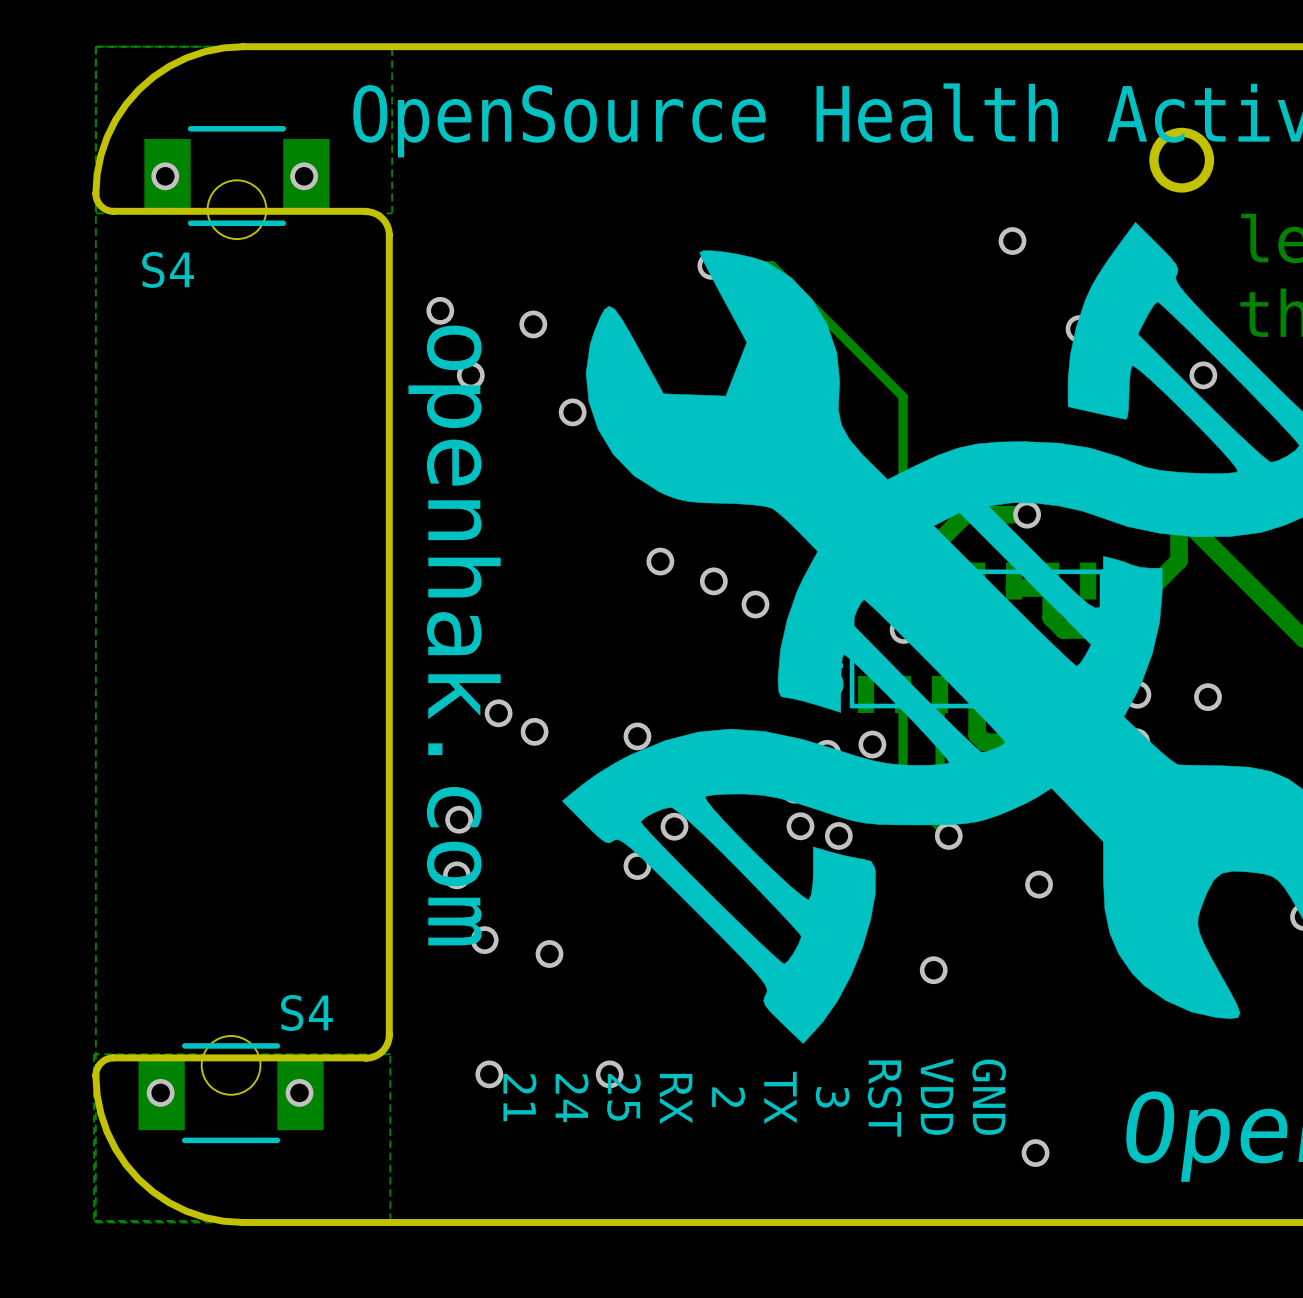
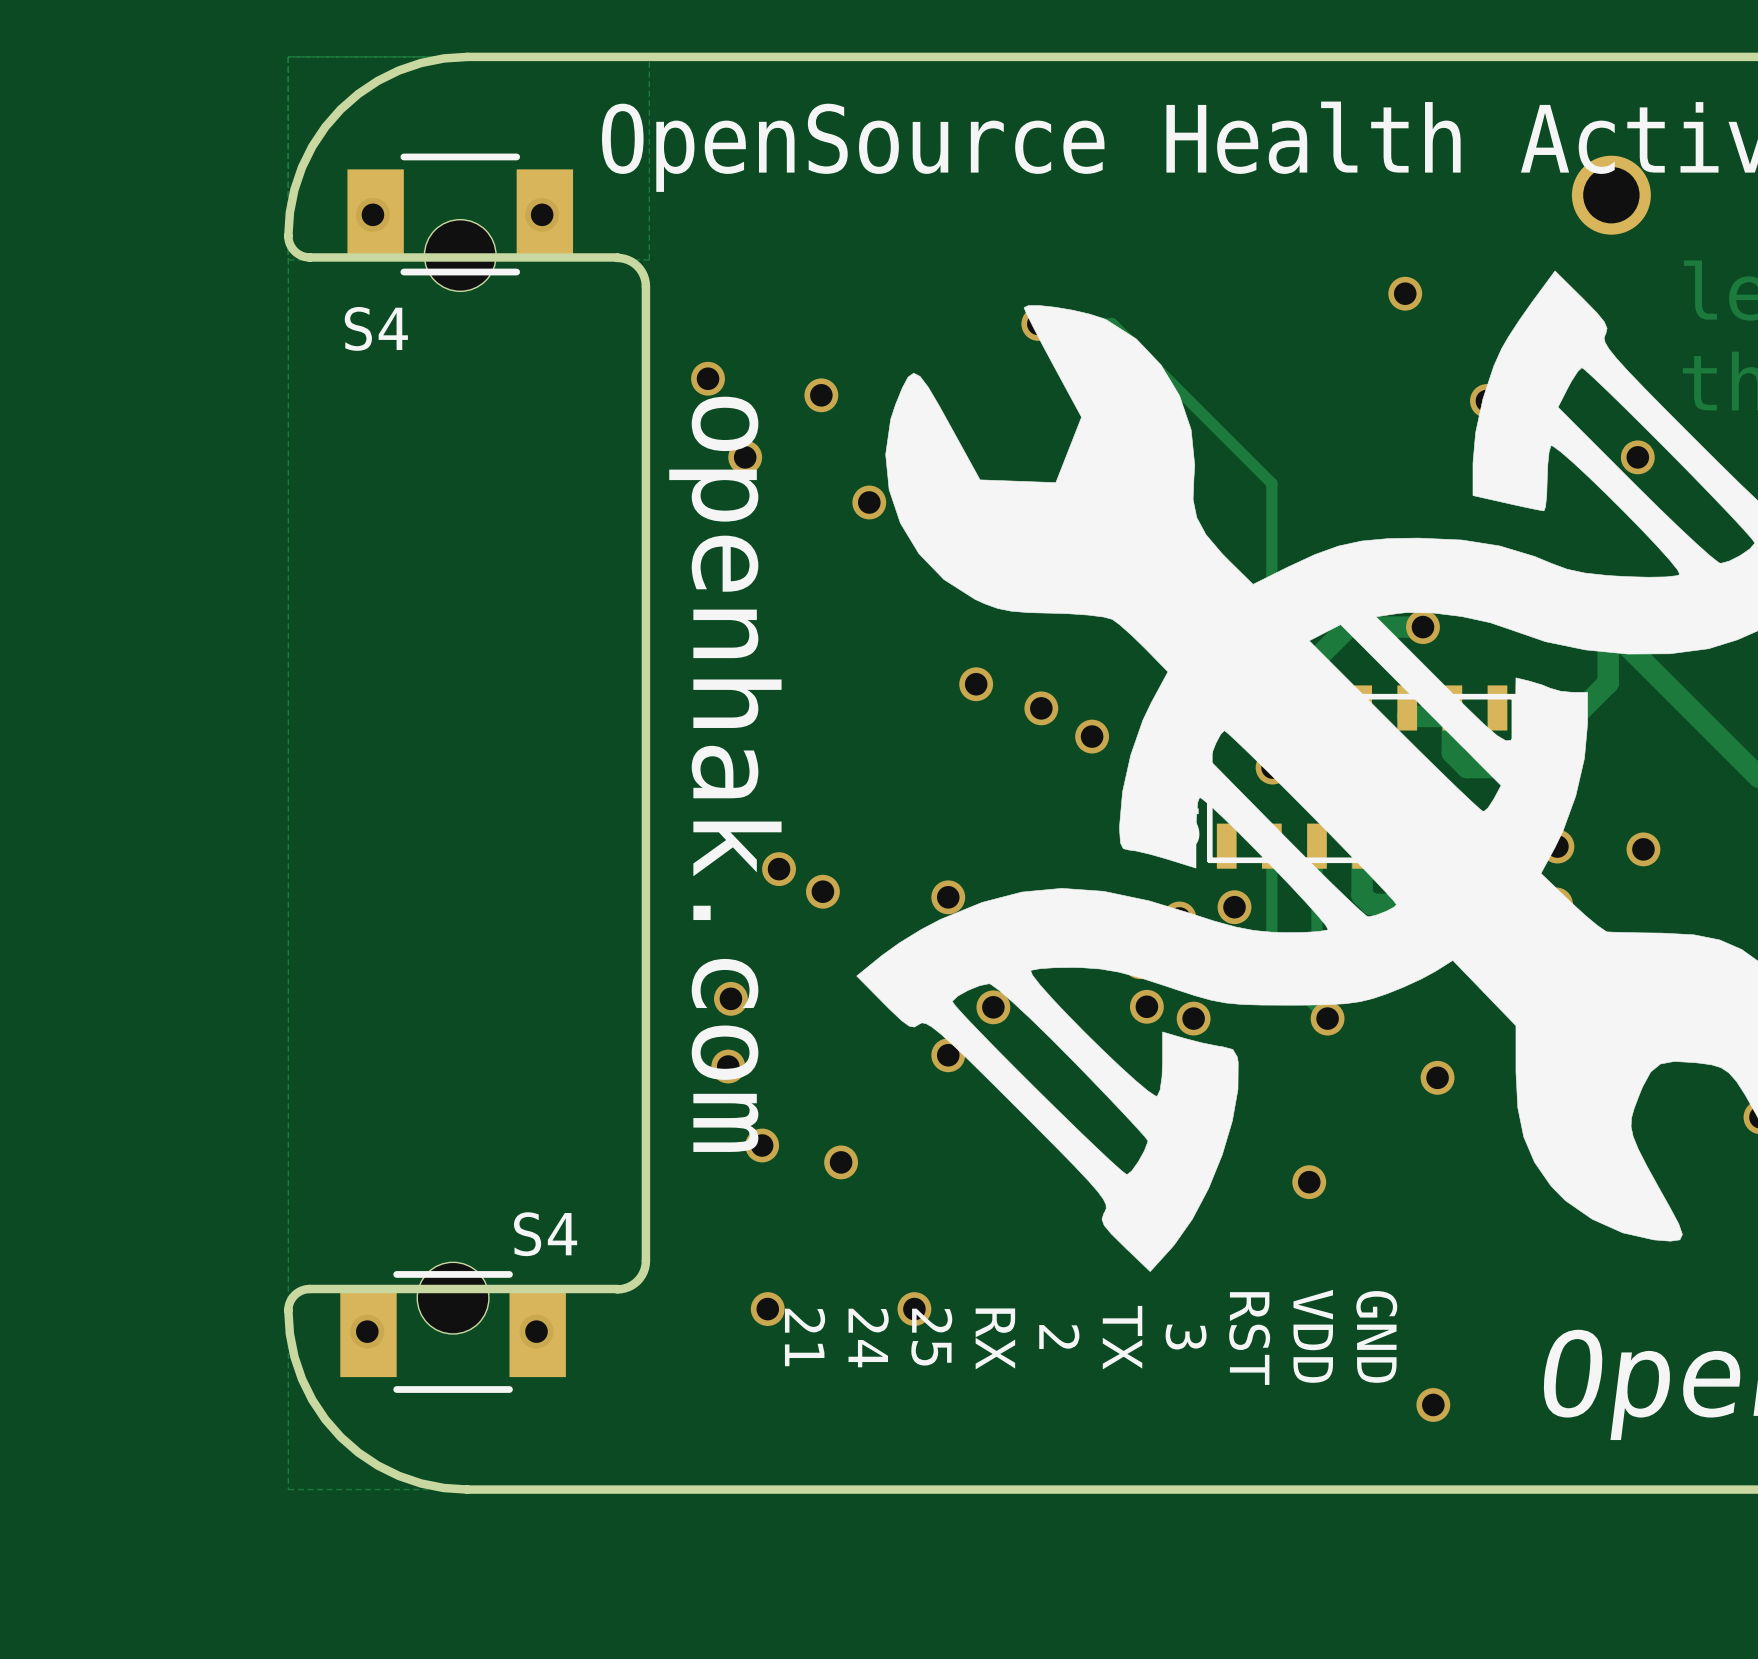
zone outline: (390, 1054) (94, 1054) (94, 1220) (390, 1220) (390, 1054) -> none

